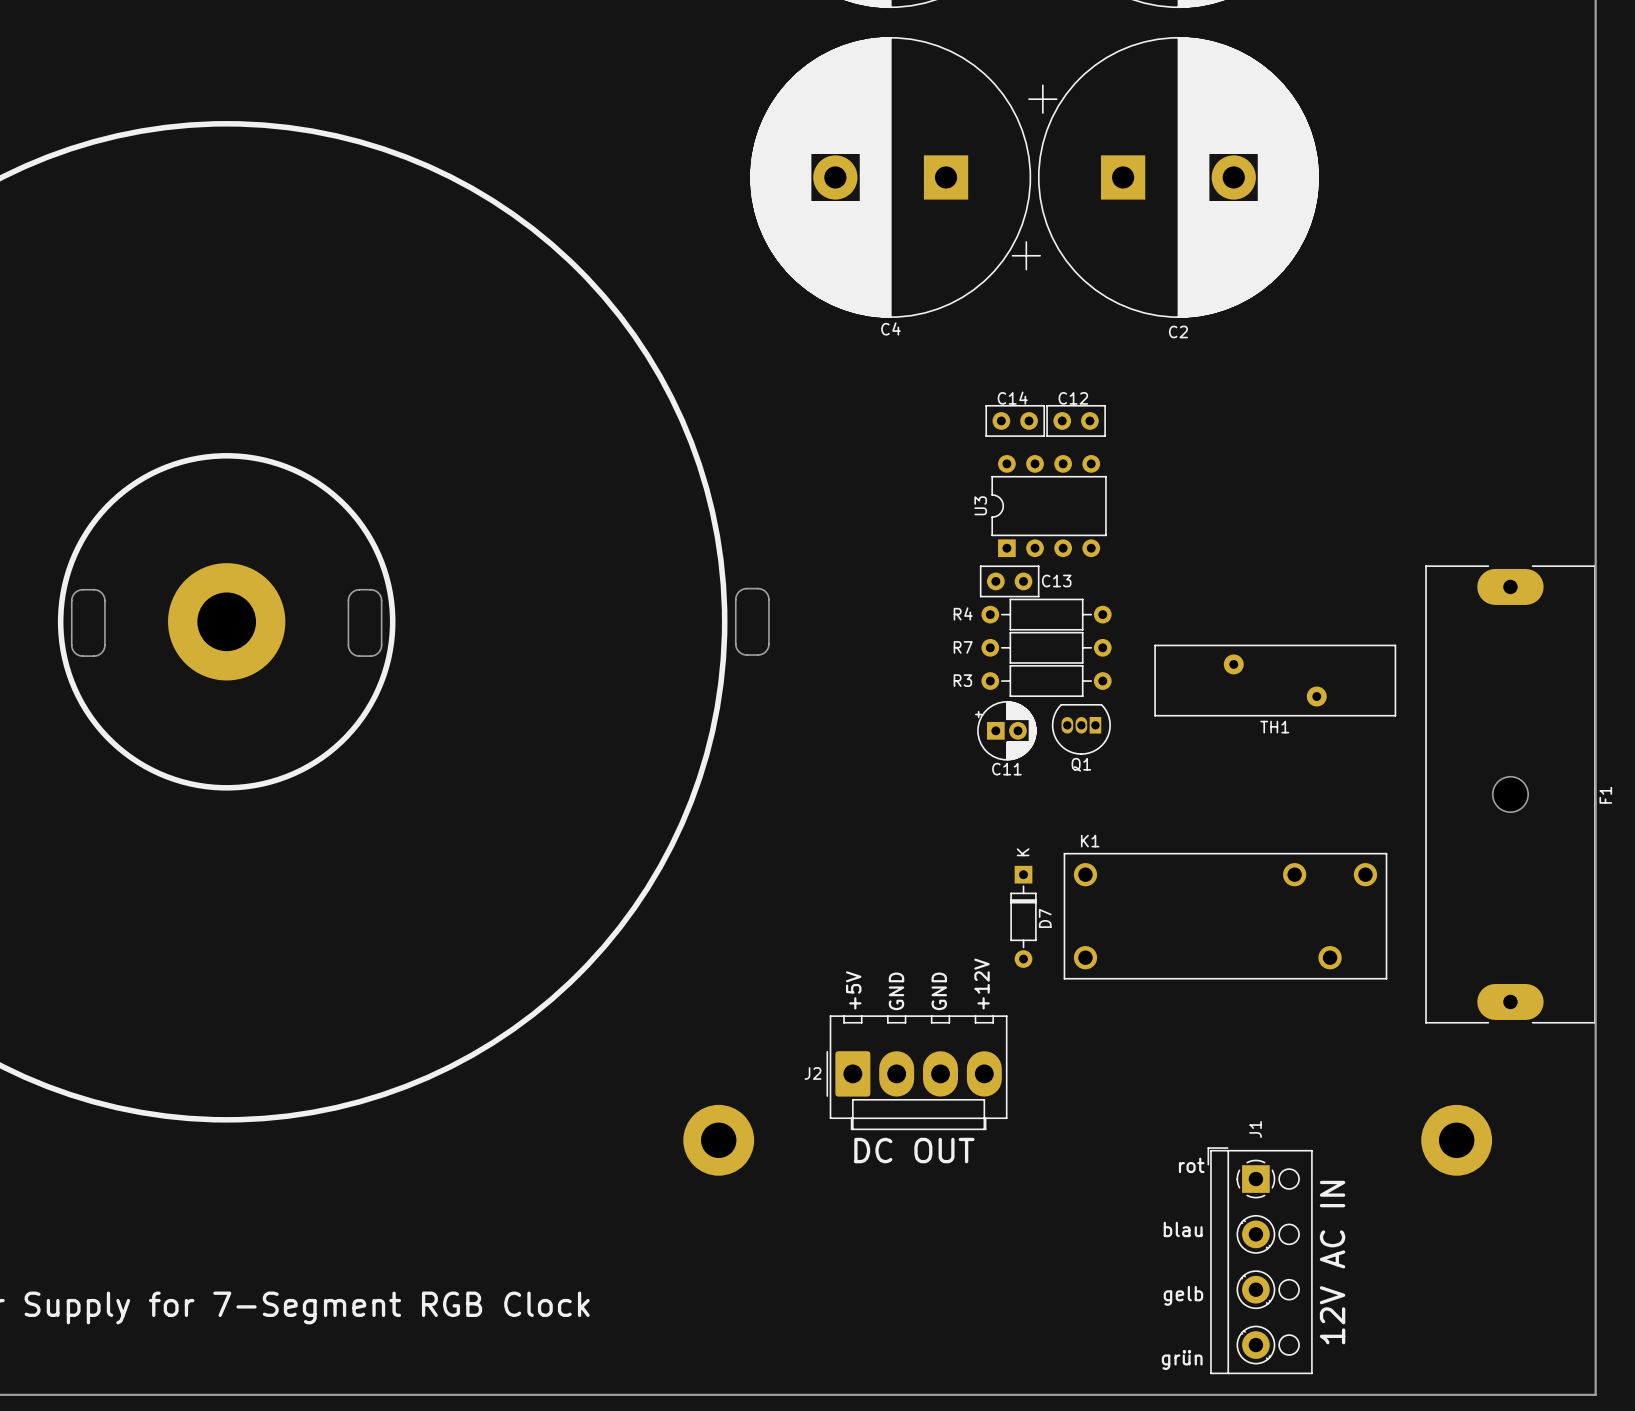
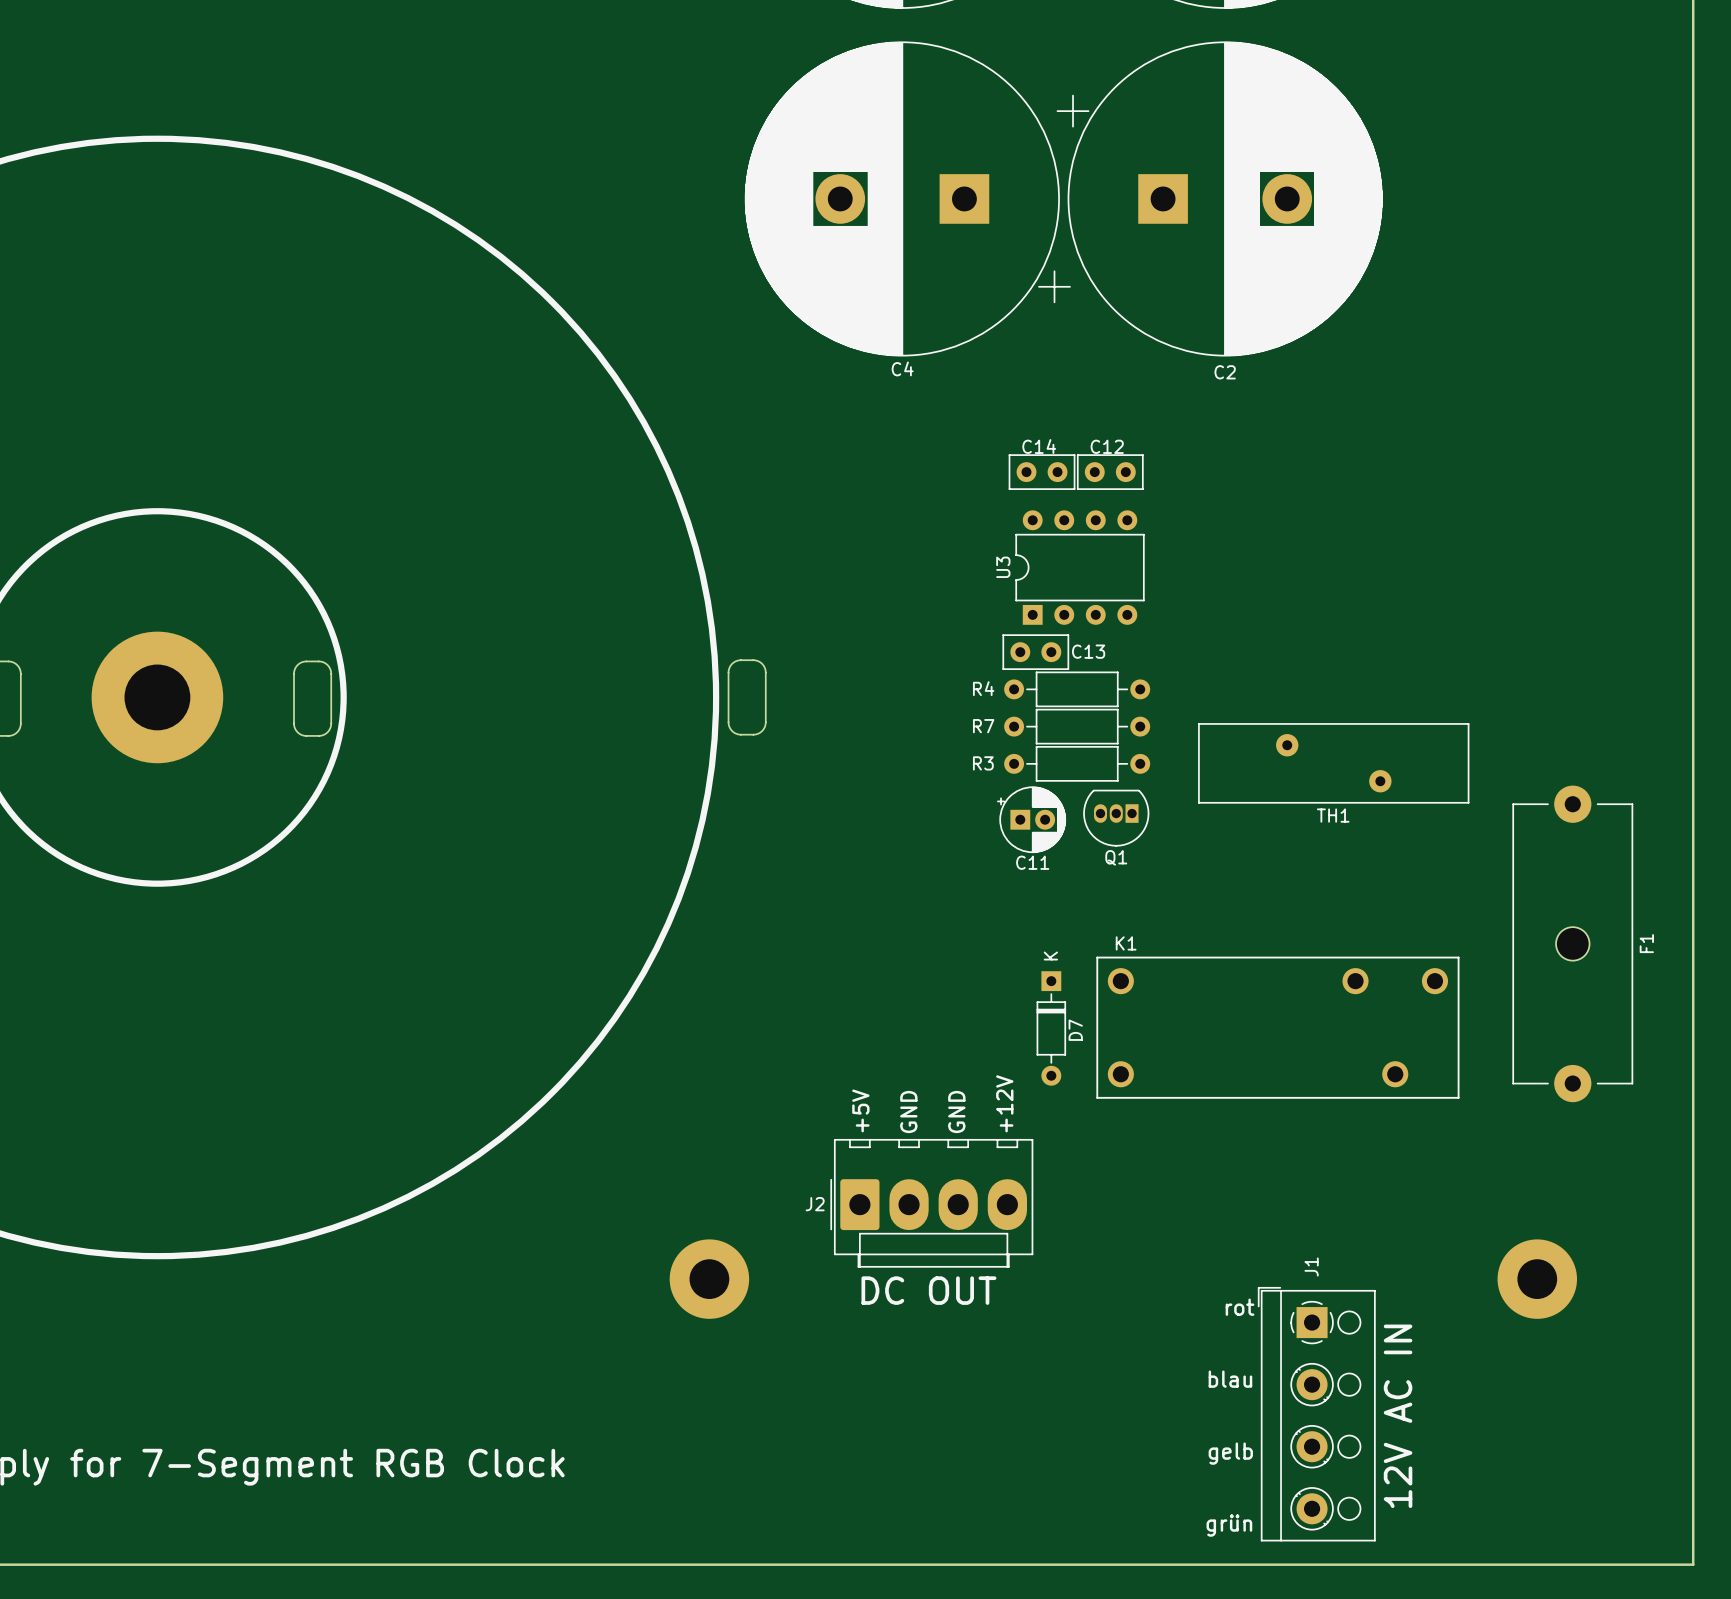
F1 footprint: [1425, 565, 1596, 1024] -> [1512, 785, 1634, 1103]
F1 name position: F1 (1605, 795) -> F1 (1646, 943)

